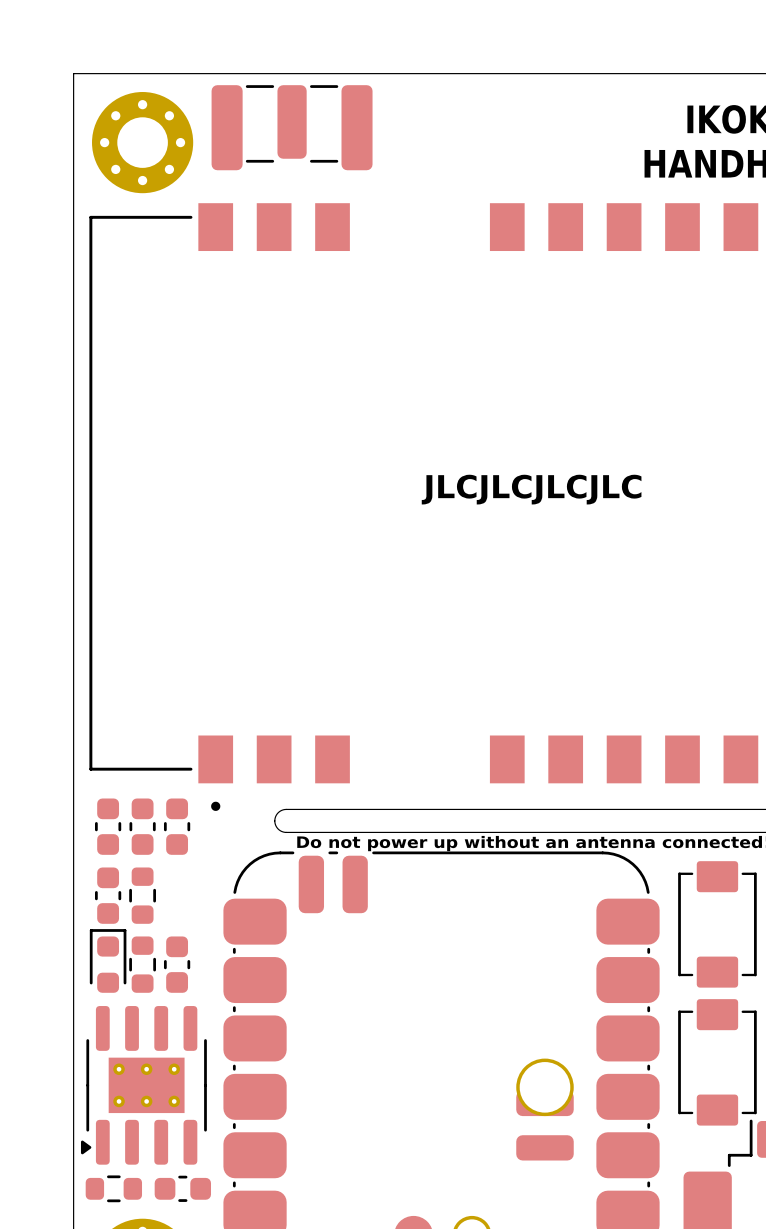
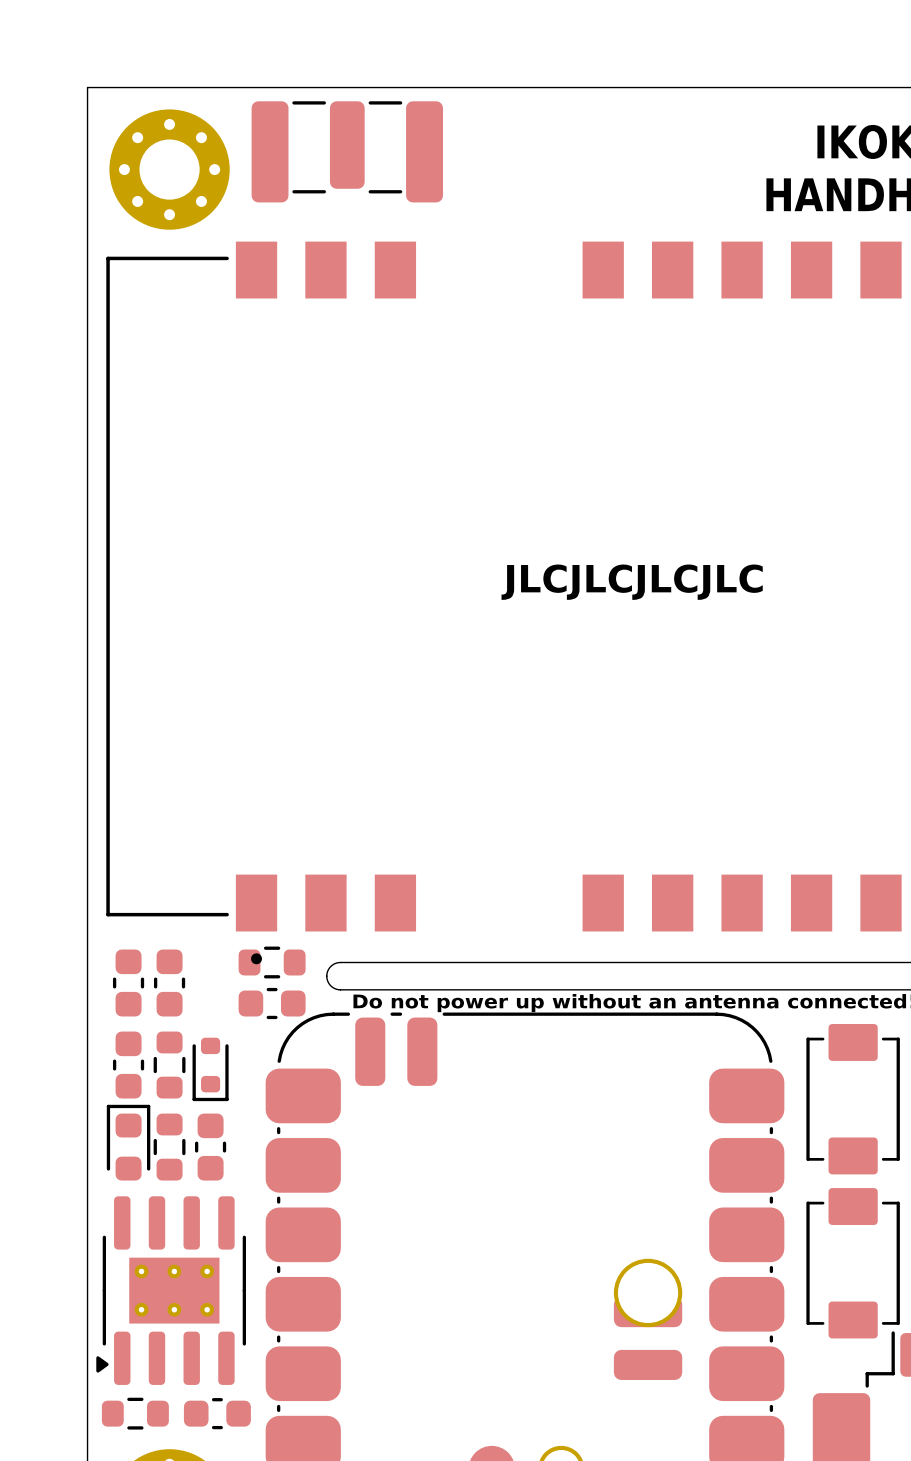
part: none -> (272, 962)
part rotation: 0° (177, 826) -> 90° clockwise (272, 1003)
part position: (177, 826) -> (272, 1003)
part: none -> (210, 1069)

